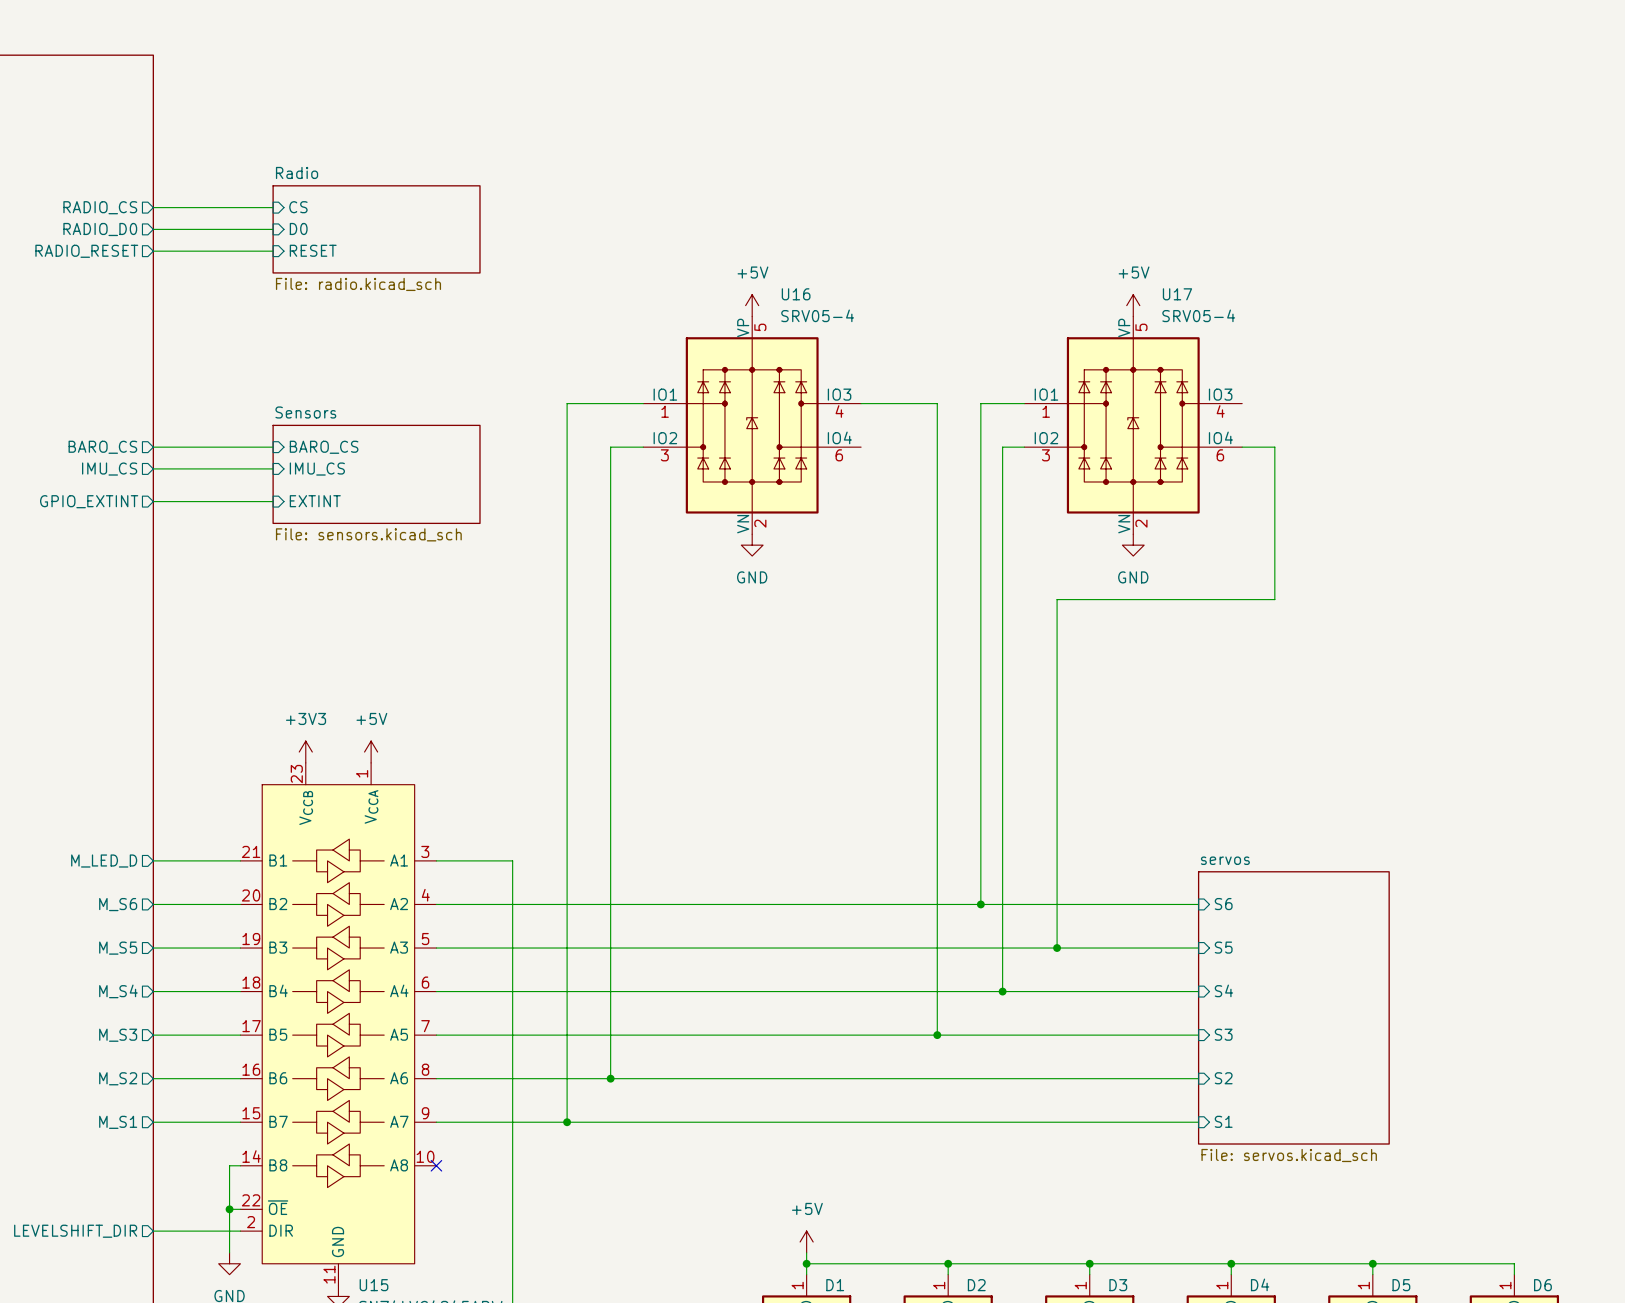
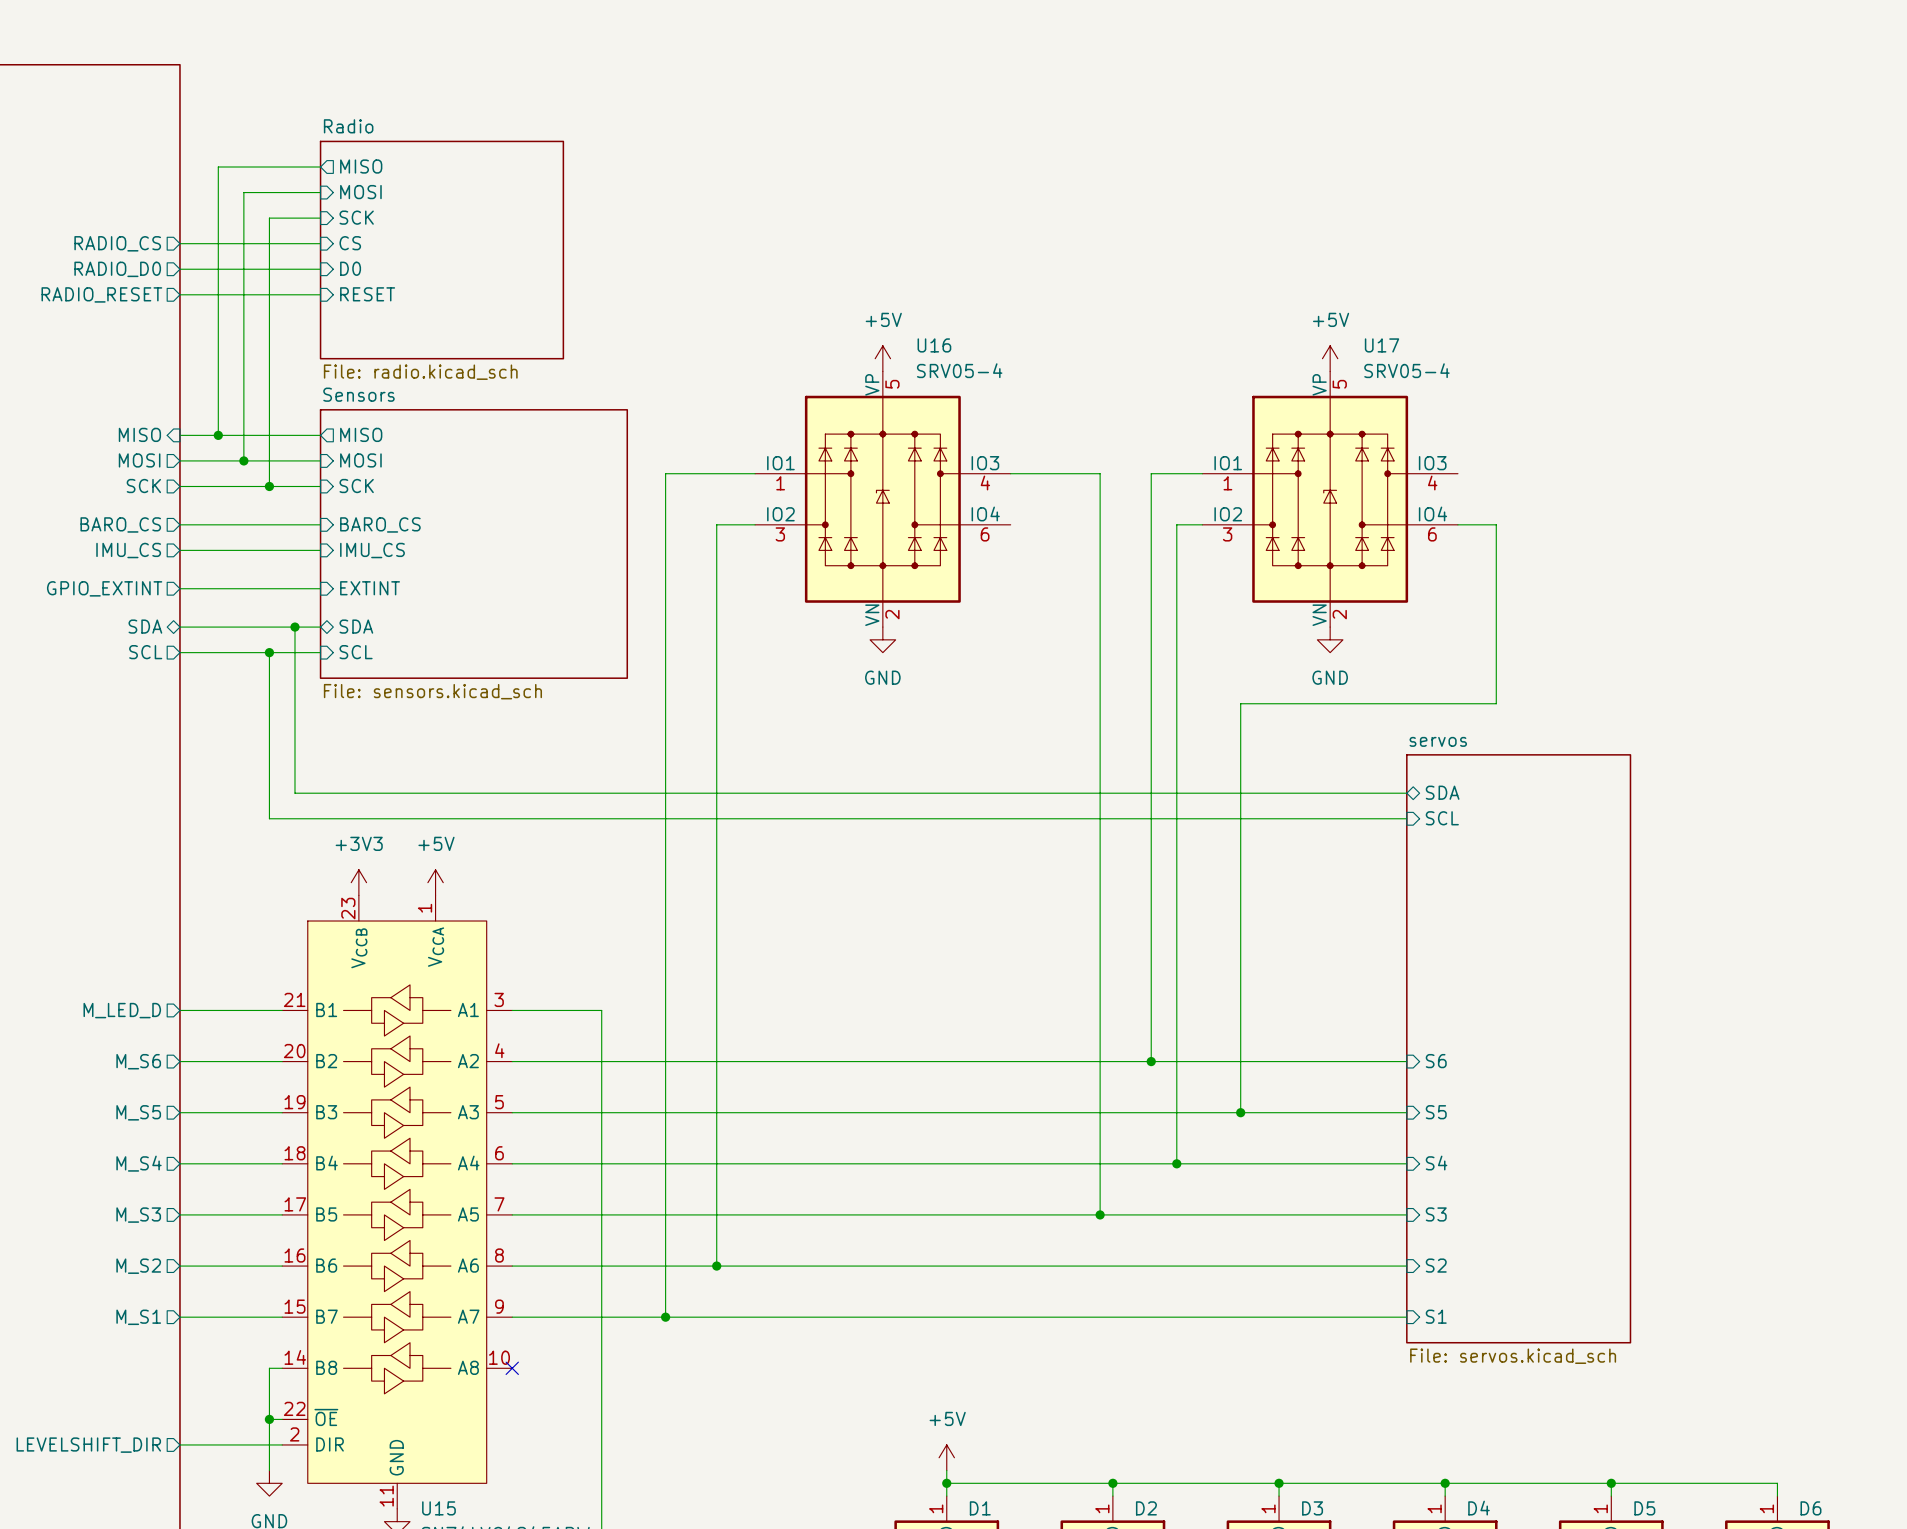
sheet pin: none -> MISO (361, 166)
wire: none -> (320, 167) (218, 167) (218, 435)
sheet pin: none -> MOSI (360, 192)
wire: none -> (320, 192) (243, 192) (243, 460)
wire: none -> (320, 218) (269, 218) (269, 486)
sheet pin: none -> SCK (356, 217)
sheet Radio: none -> File: radio.kicad_sch (441, 250)
sheet Radio: File: radio.kicad_sch (376, 229) -> none
sheet pin: none -> MISO (139, 434)
wire: none -> (179, 435) (320, 435)
junction: none -> (218, 435)
sheet pin: none -> MISO (361, 434)
sheet pin: none -> MOSI (139, 460)
wire: none -> (179, 460) (320, 460)
junction: none -> (243, 460)
sheet pin: none -> MOSI (360, 460)
sheet pin: none -> SCK (143, 486)
wire: none -> (179, 486) (320, 486)
junction: none -> (269, 486)
sheet pin: none -> SCK (356, 486)
sheet Sensors: none -> File: sensors.kicad_sch (473, 544)
sheet Sensors: File: sensors.kicad_sch (376, 474) -> none
sheet pin: none -> SDA (145, 626)
sheet pin: none -> SDA (356, 626)
wire: none -> (179, 627) (320, 627)
wire: none -> (294, 627) (294, 793) (1406, 793)
junction: none -> (294, 627)
sheet pin: none -> SCL (145, 652)
sheet pin: none -> SCL (356, 652)
wire: none -> (179, 652) (320, 652)
wire: none -> (269, 652) (269, 818) (1406, 818)
junction: none -> (269, 652)
sheet pin: none -> SDA (1442, 792)
sheet pin: none -> SCL (1442, 818)
sheet servos: none -> File: servos.kicad_sch (1518, 1048)
sheet servos: File: servos.kicad_sch (1293, 1007) -> none

